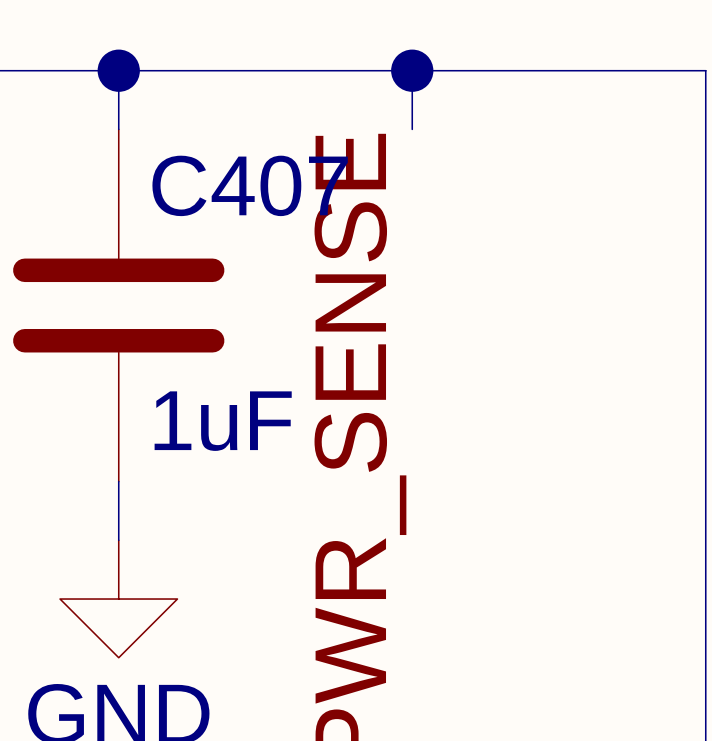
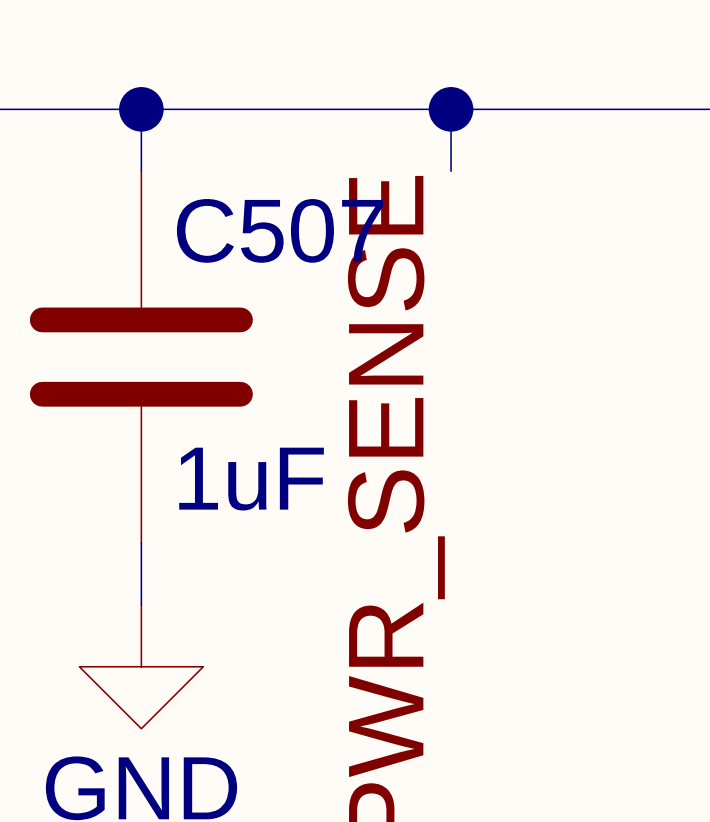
C407 name: C407 (250, 185) -> C507 (279, 230)

